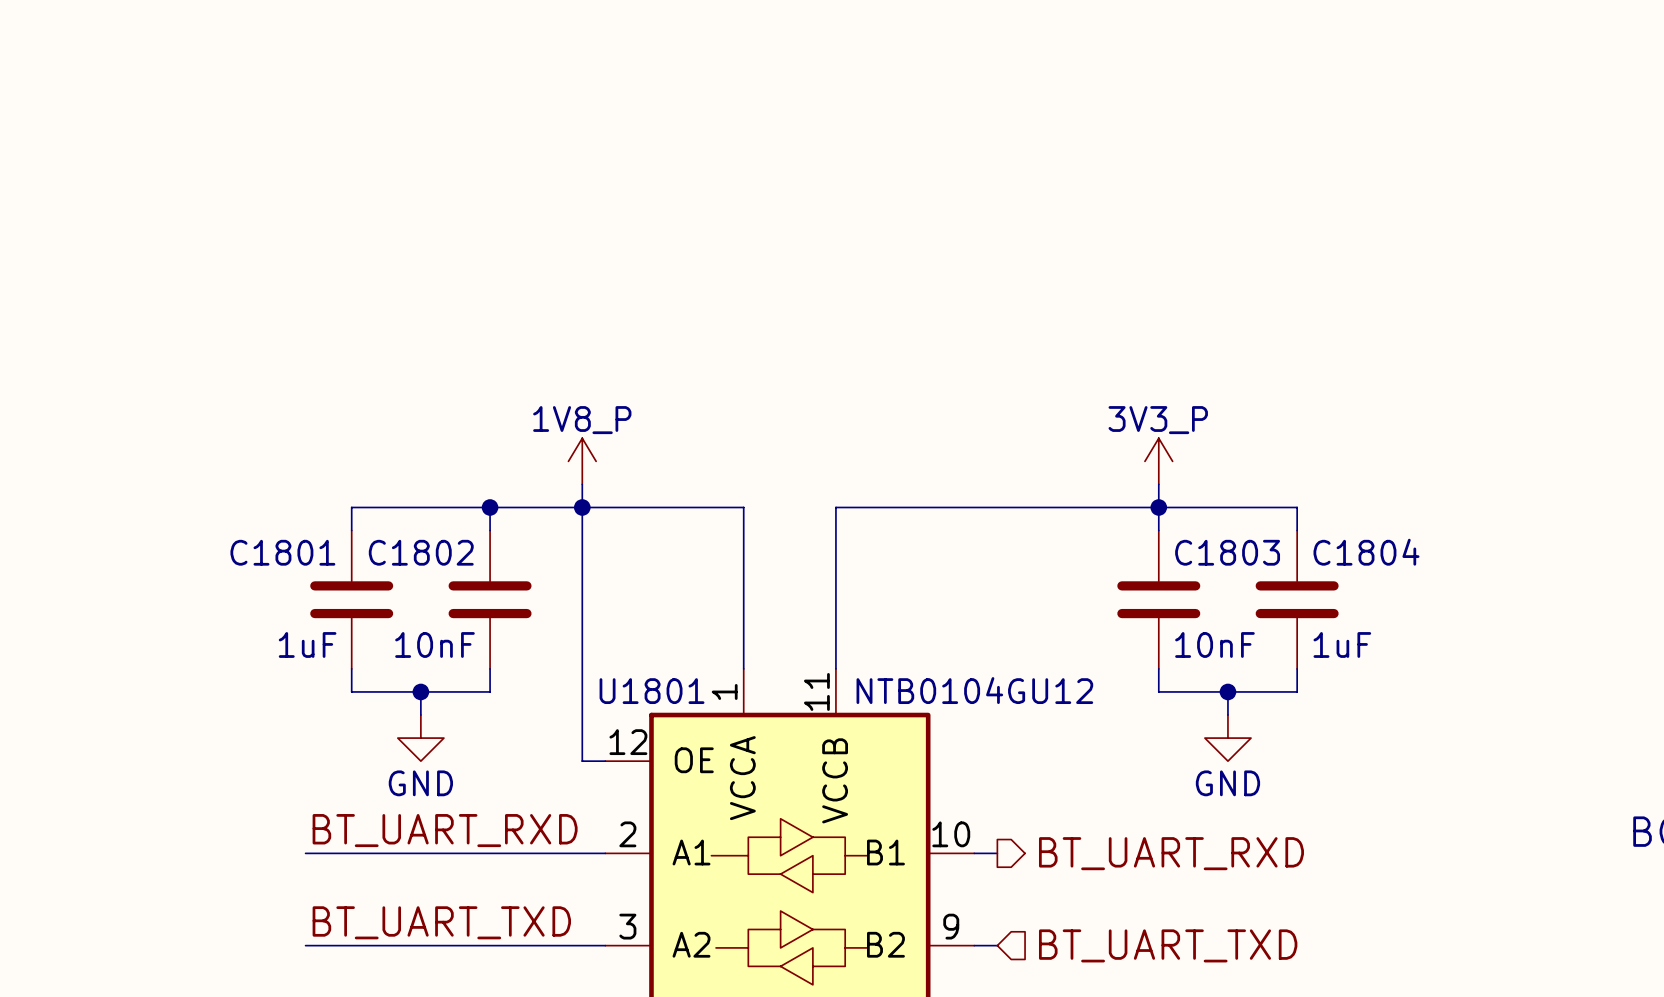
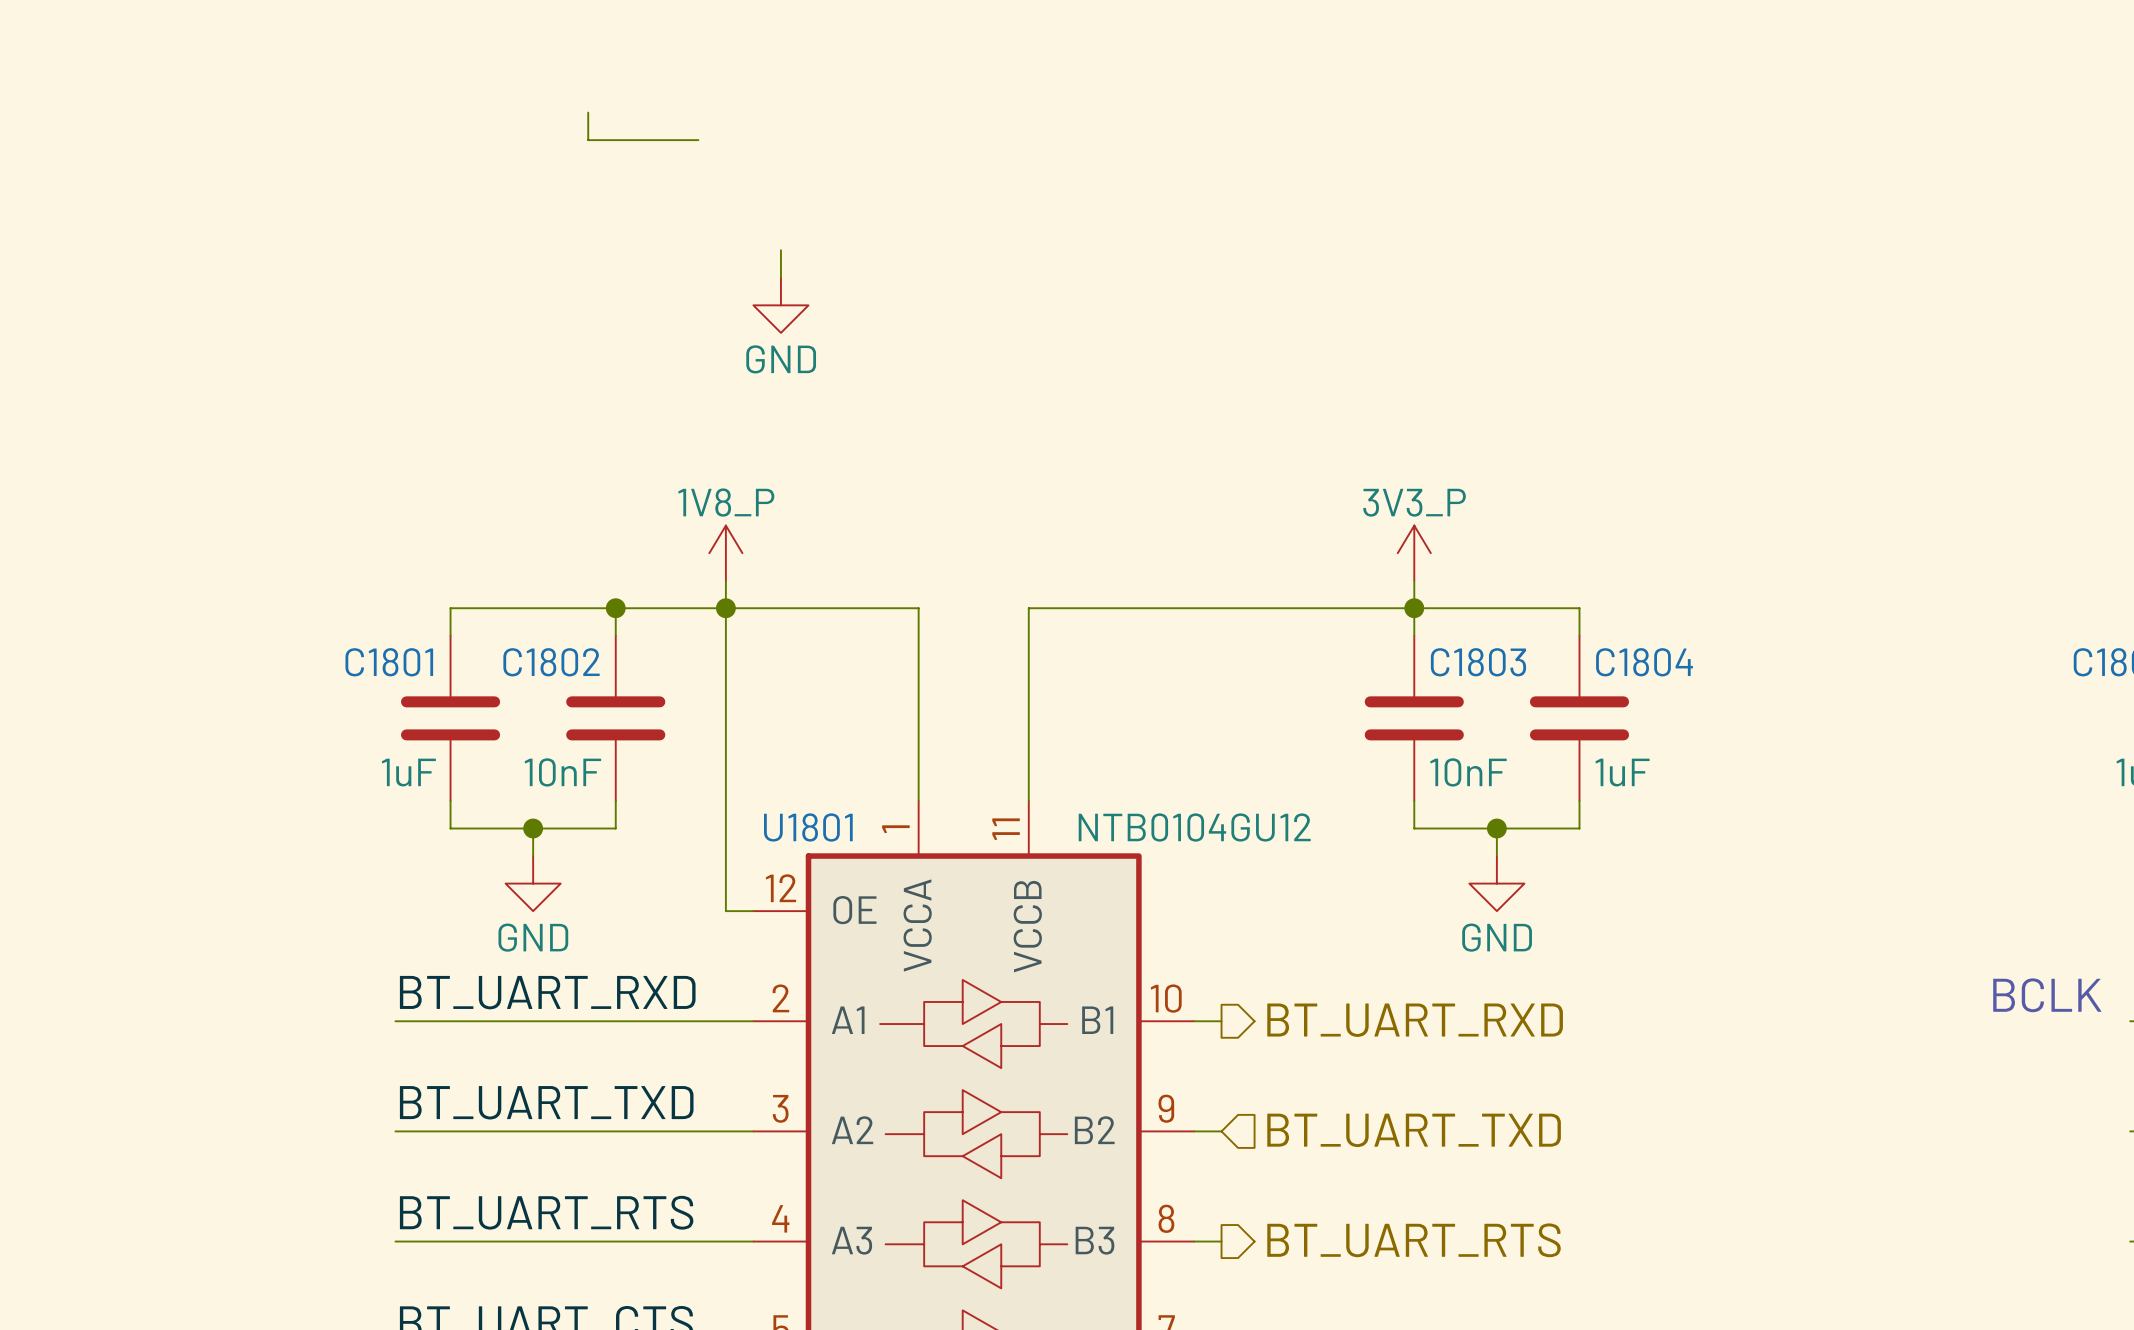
wire: none -> (588, 112) (588, 140) (698, 140)
wire: none -> (780, 250) (780, 277)
power symbol: none -> GND (780, 305)

